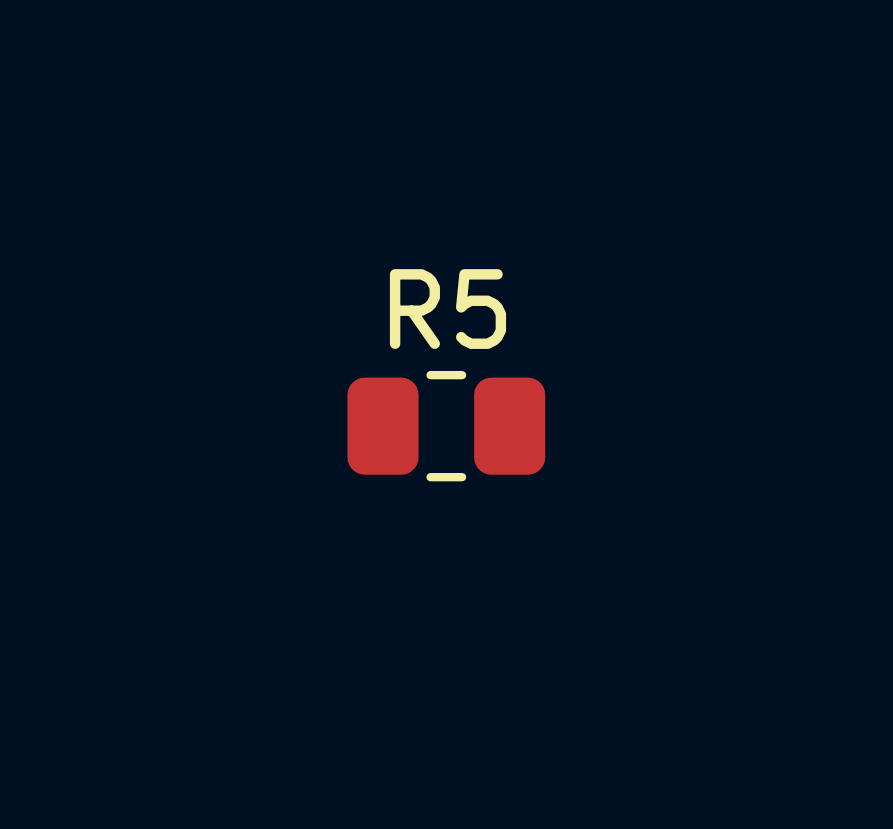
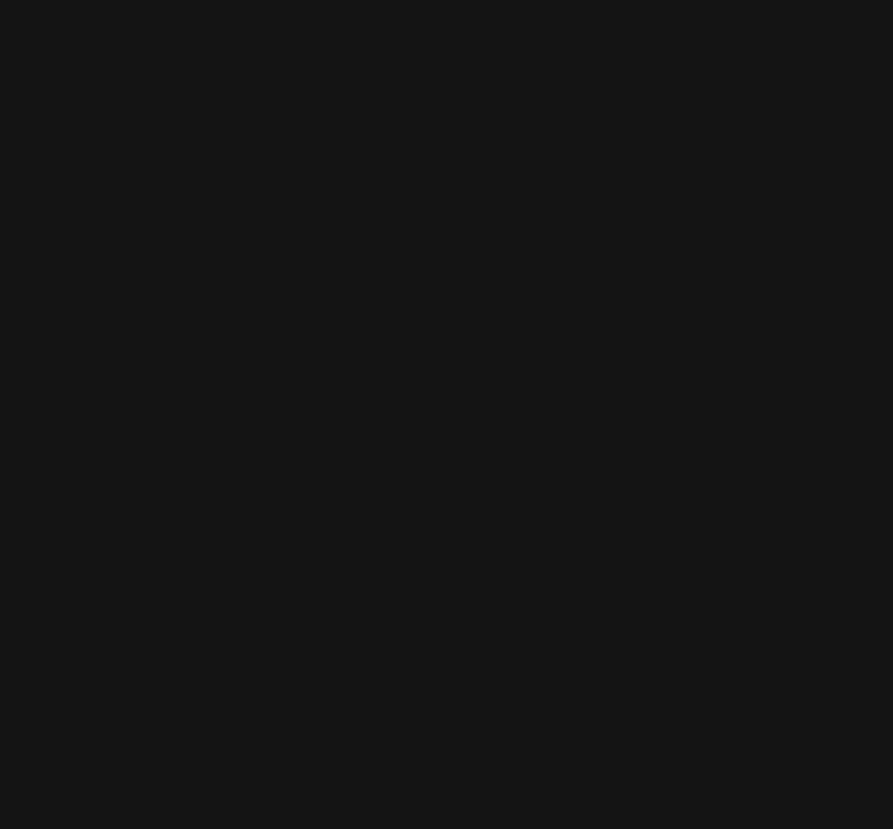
R5: (446, 426) -> none

